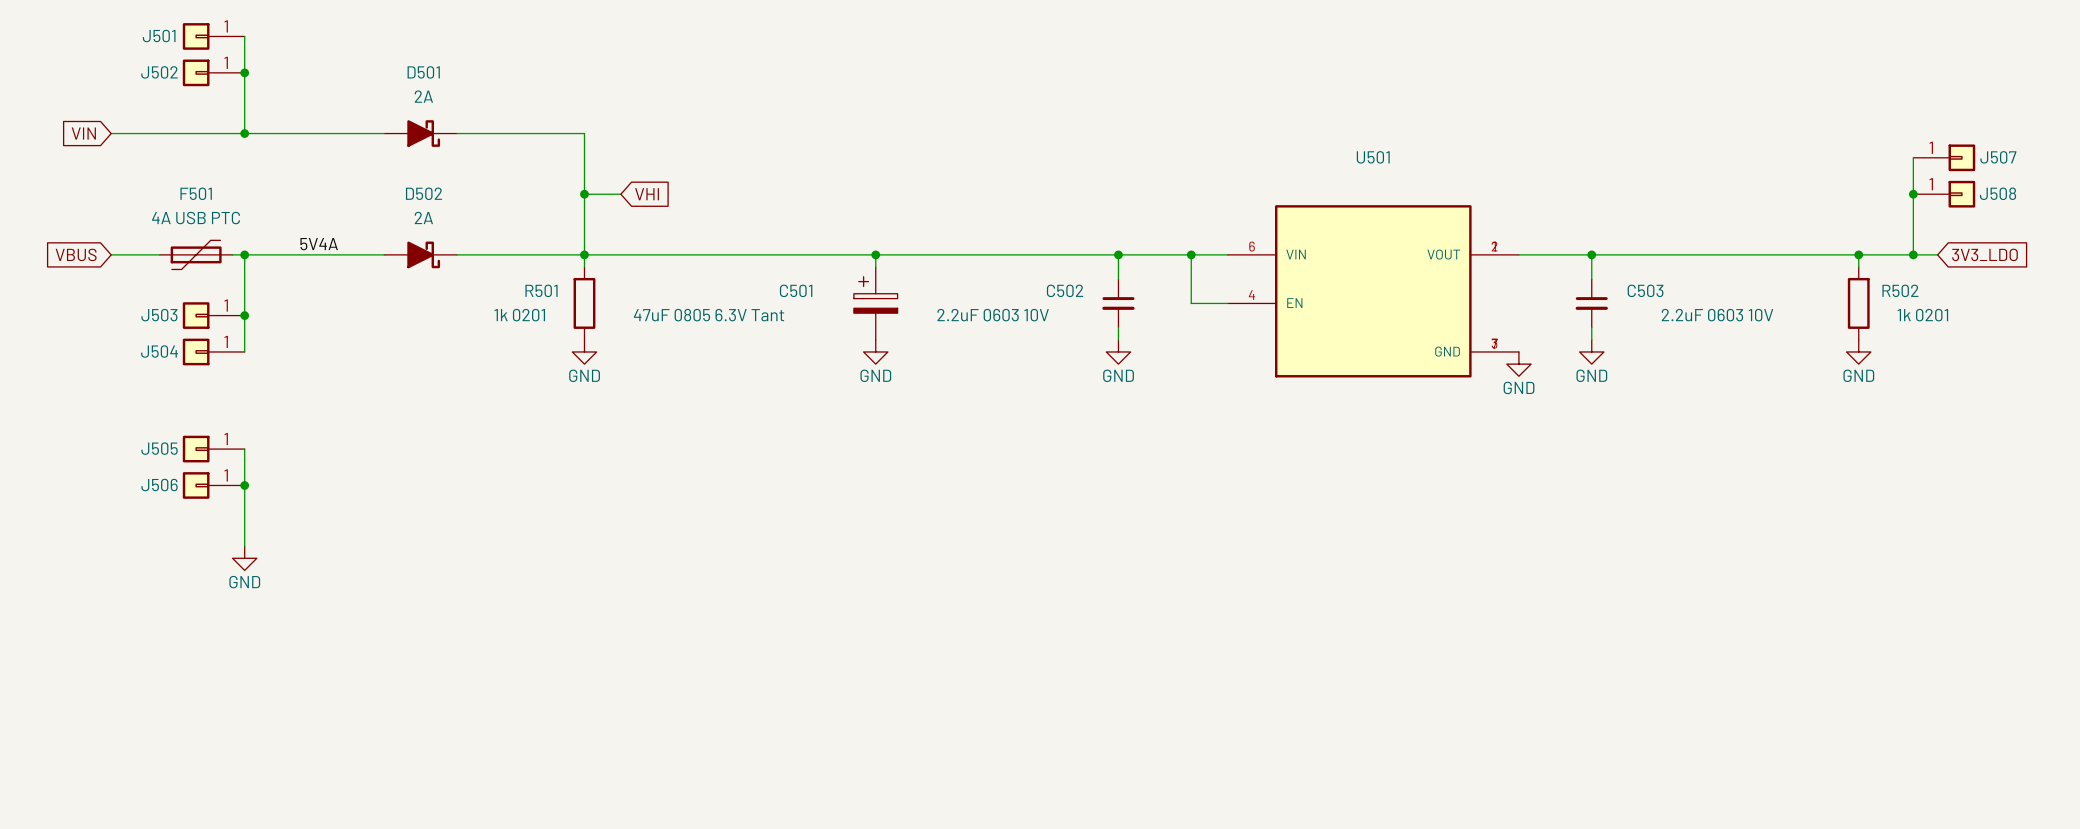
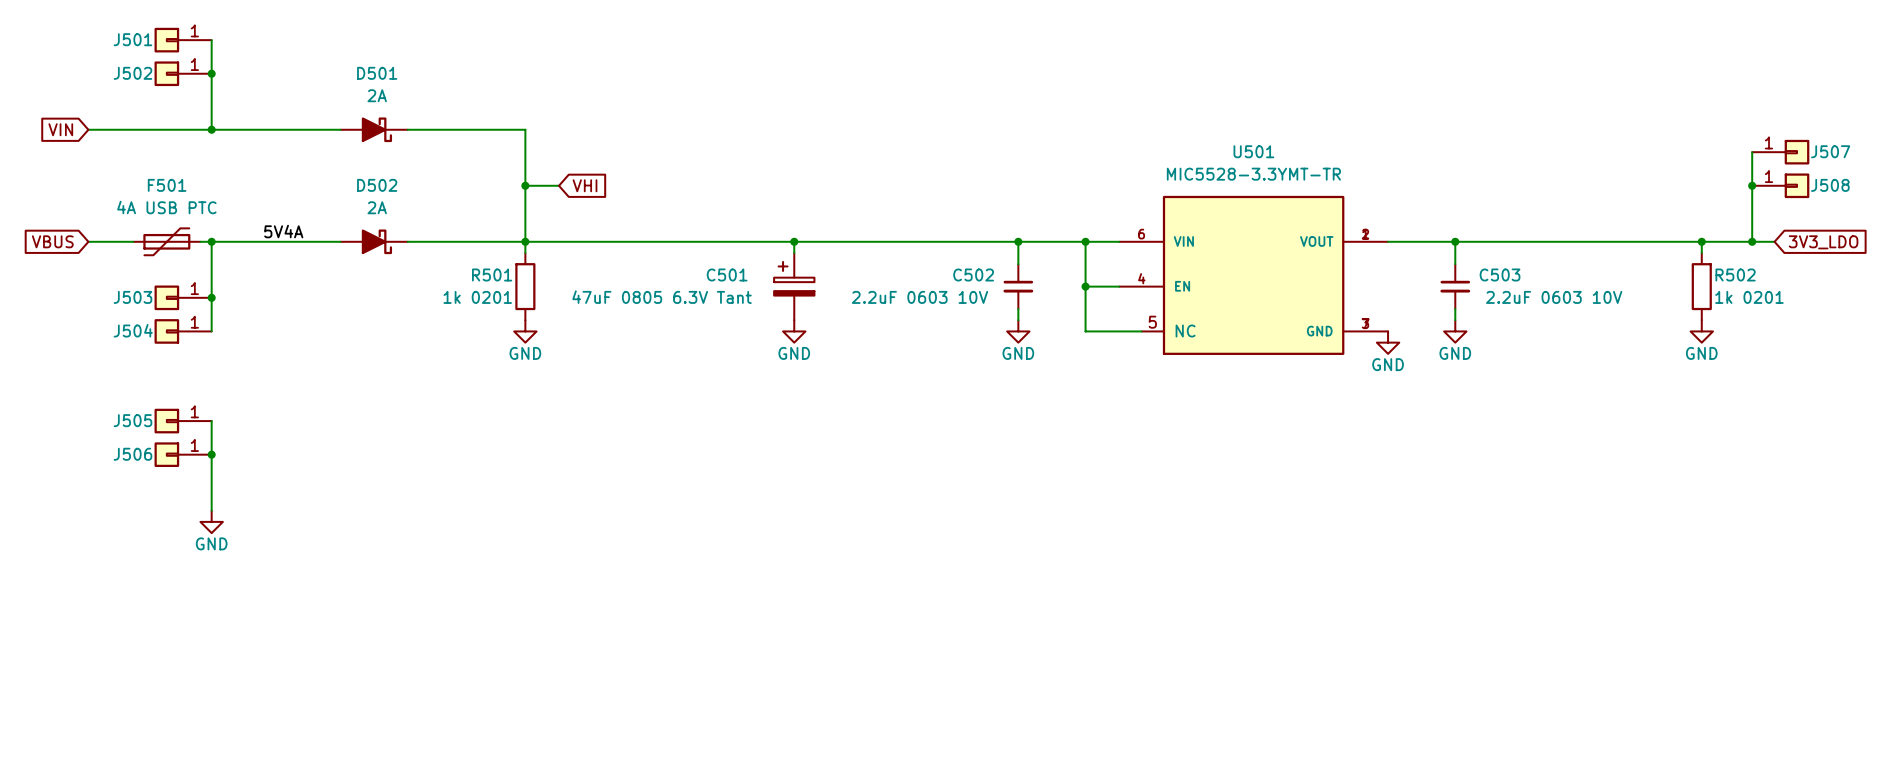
U501 value: none -> MIC5528-3.3YMT-TR (1253, 174)
U501 symbol: [1227, 205, 1519, 378] -> [1119, 195, 1389, 355]
wire: none -> (1085, 286) (1085, 331) (1141, 331)
junction: none -> (1085, 286)

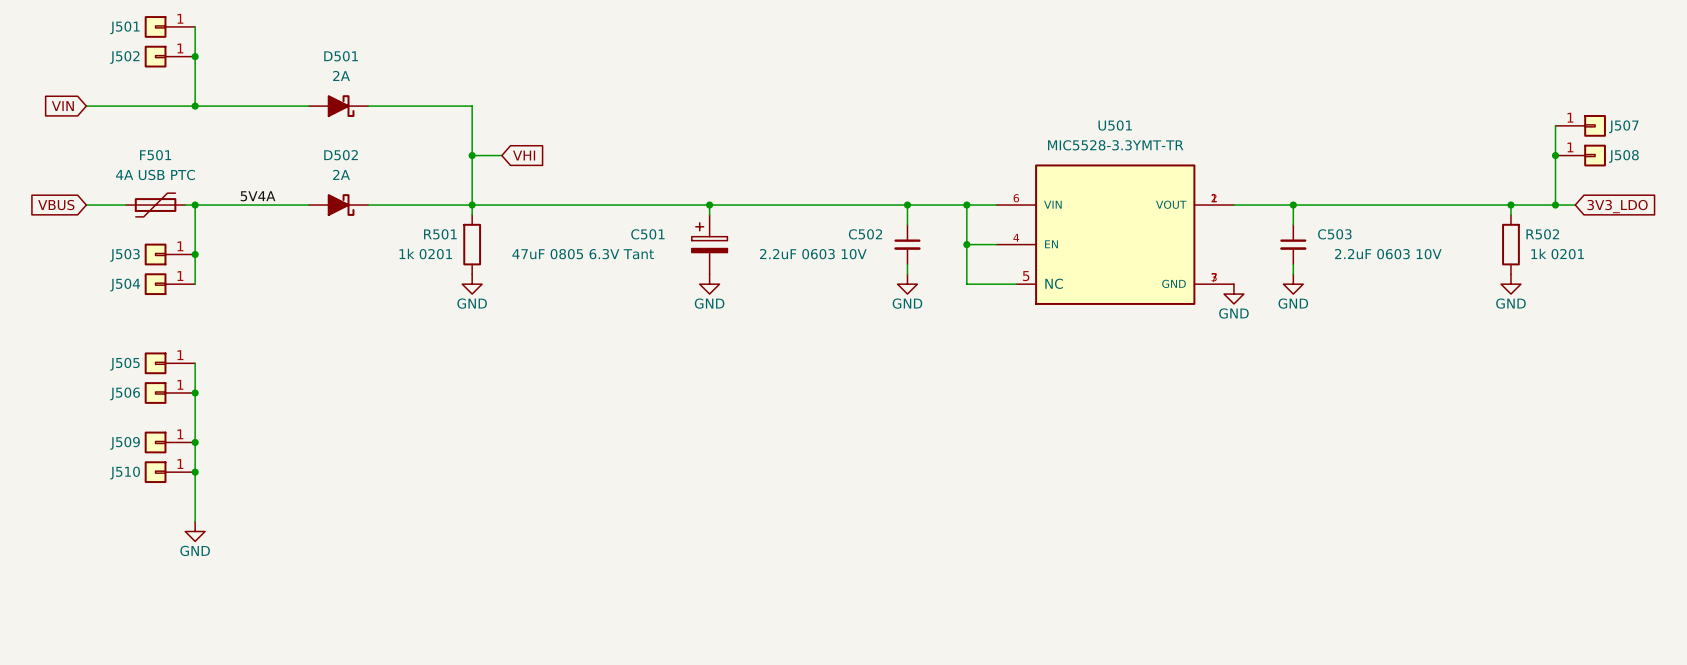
J509: none -> (169, 442)
wire: none -> (195, 442) (195, 521)
junction: none -> (195, 442)
power symbol position: GND (211, 521) -> GND (195, 531)
J510: none -> (169, 472)
junction: none -> (195, 472)

